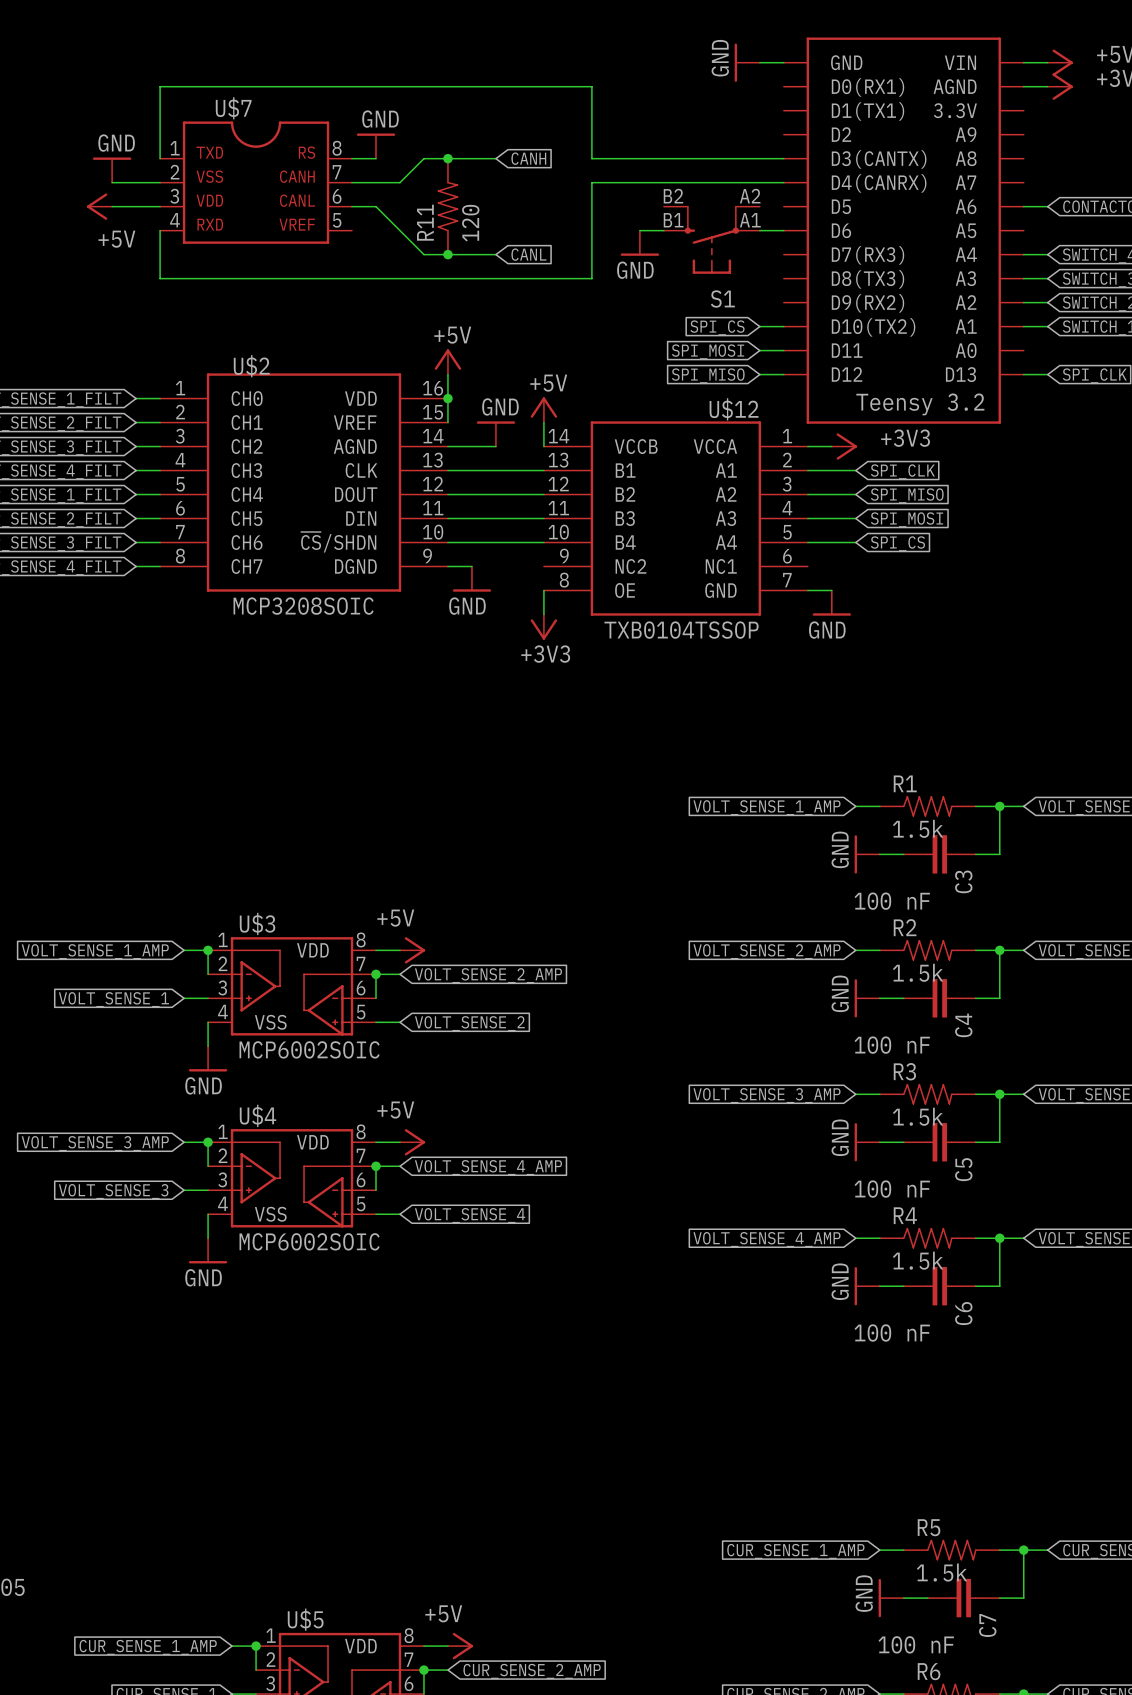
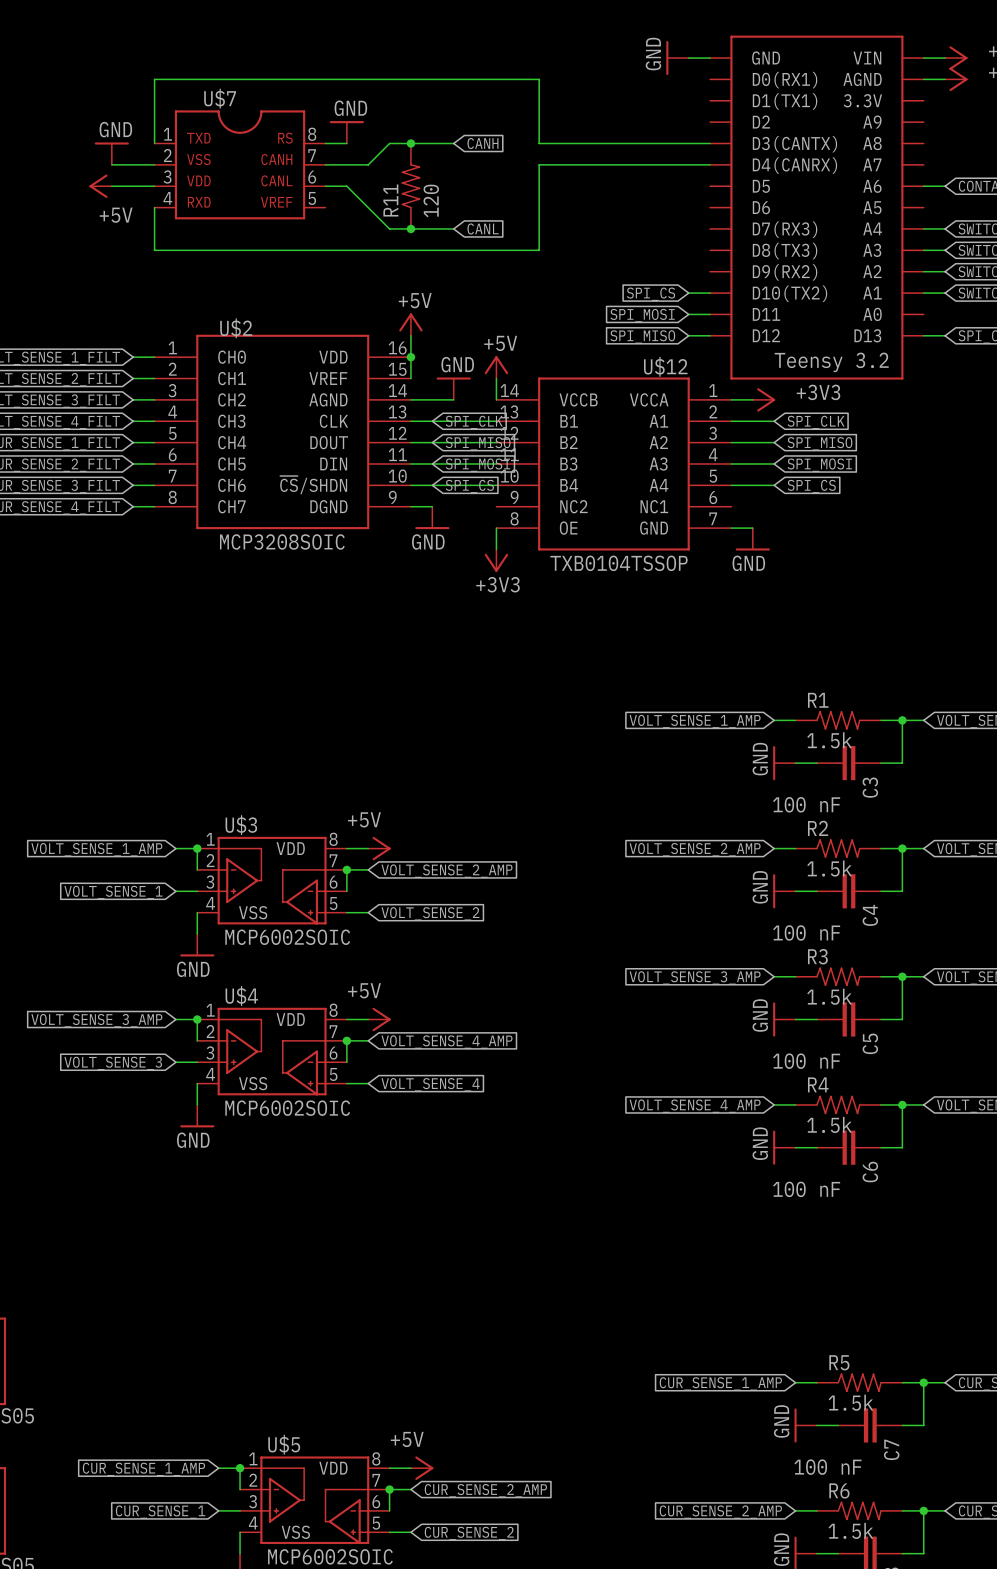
wire: (639, 230) (663, 230) -> none
wire: (759, 230) (783, 230) -> none
S1: (711, 239) -> none
power symbol: GND (639, 243) -> none
global label: none -> SPI_CLK (474, 422)
global label: none -> SPI_MISO (478, 443)
global label: none -> SPI_MOSI (477, 465)
global label: none -> SPI_CS (469, 486)

